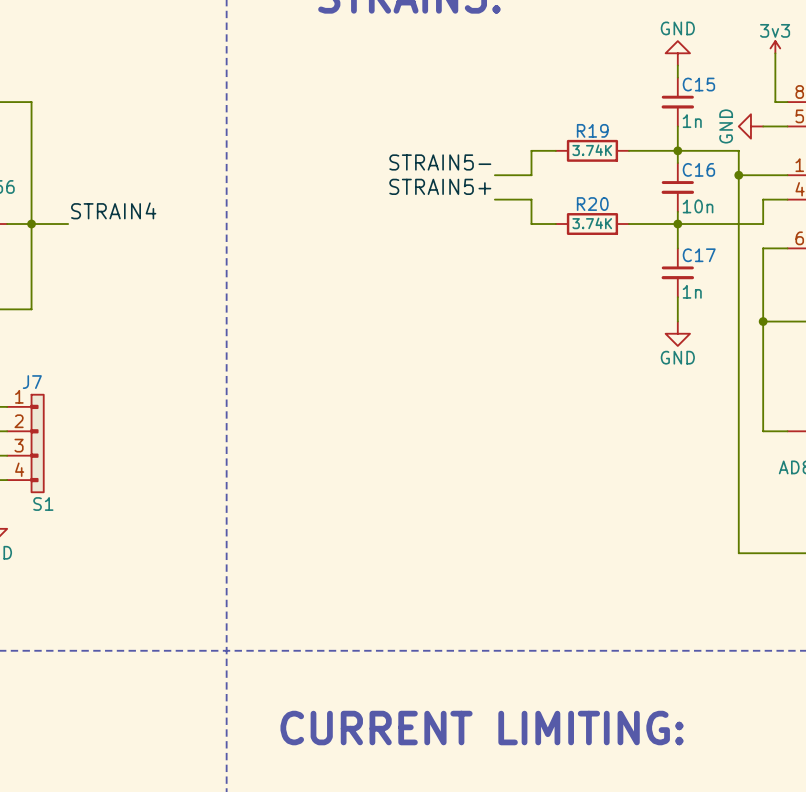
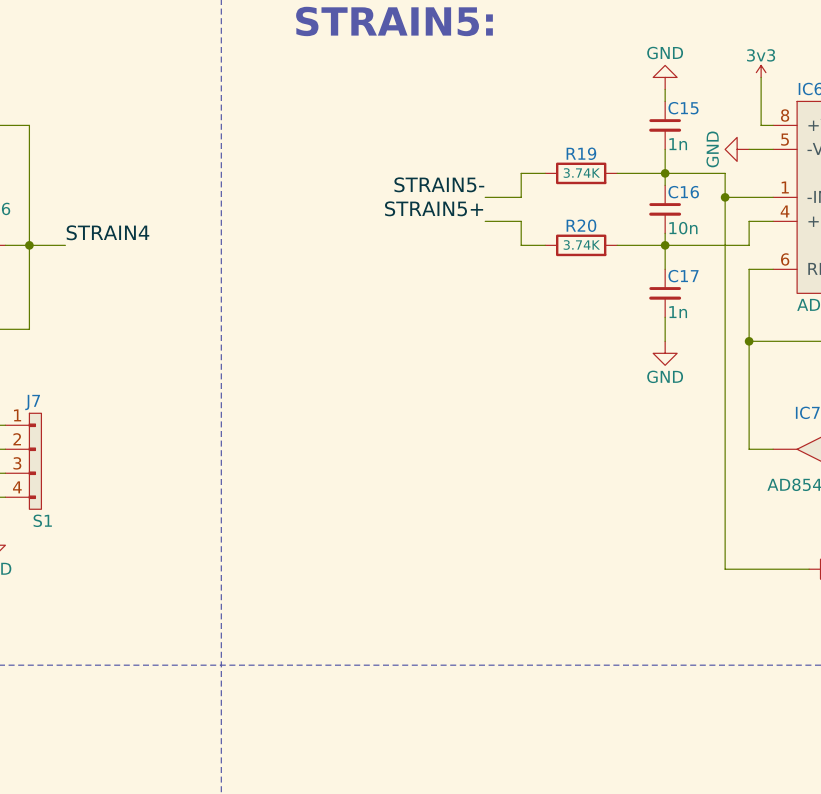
text: CURRENT LIMITING: (482, 728) -> none

